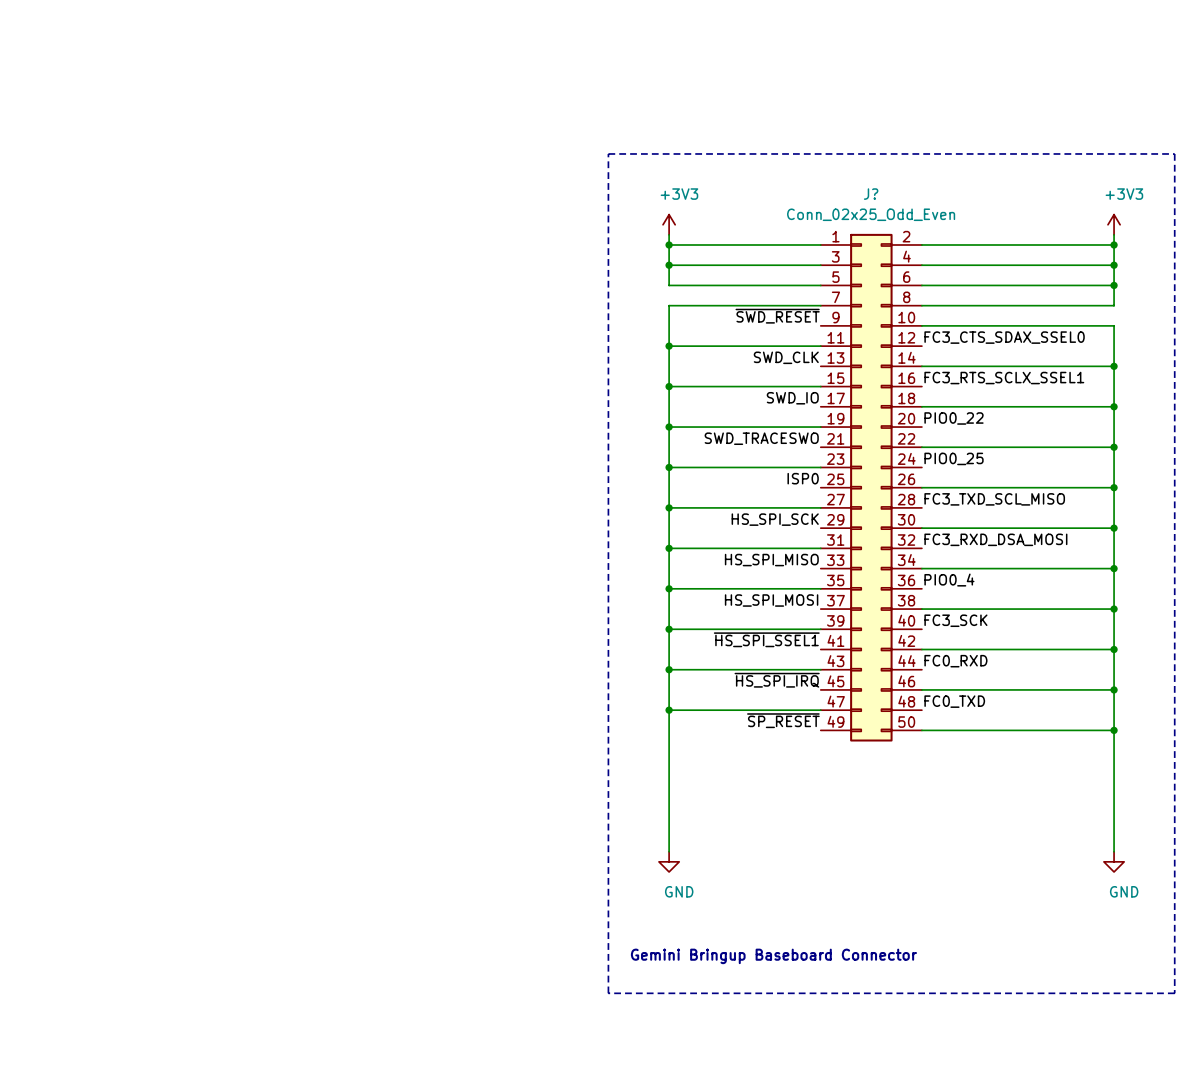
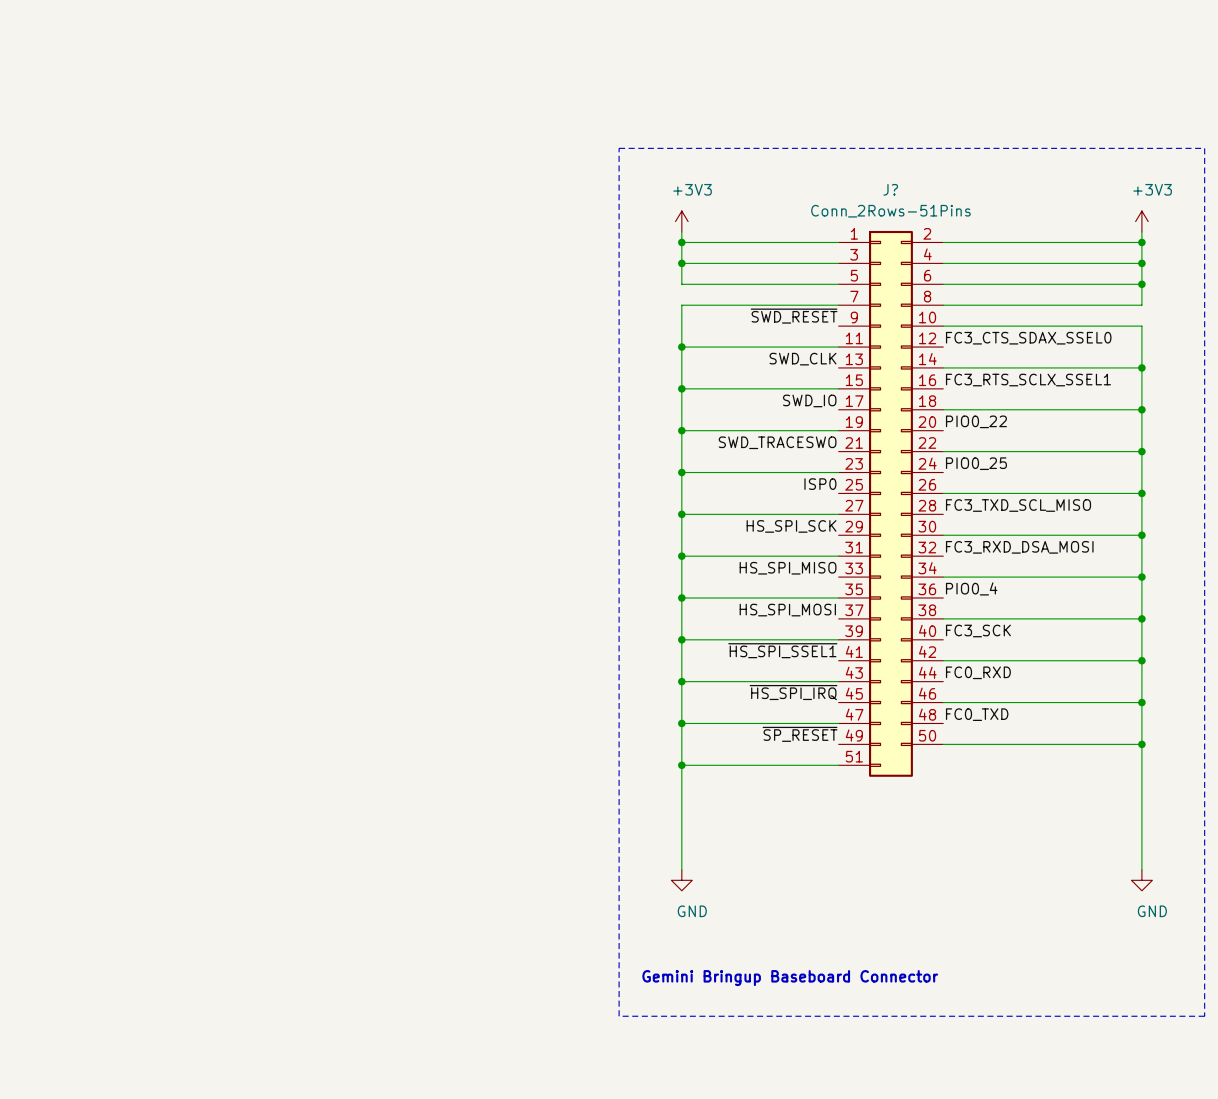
J?: Conn_02x25_Odd_Even (871, 487) -> none
J?: none -> Conn_2Rows-51Pins (890, 503)
wire: none -> (681, 765) (838, 765)
junction: none -> (681, 765)

